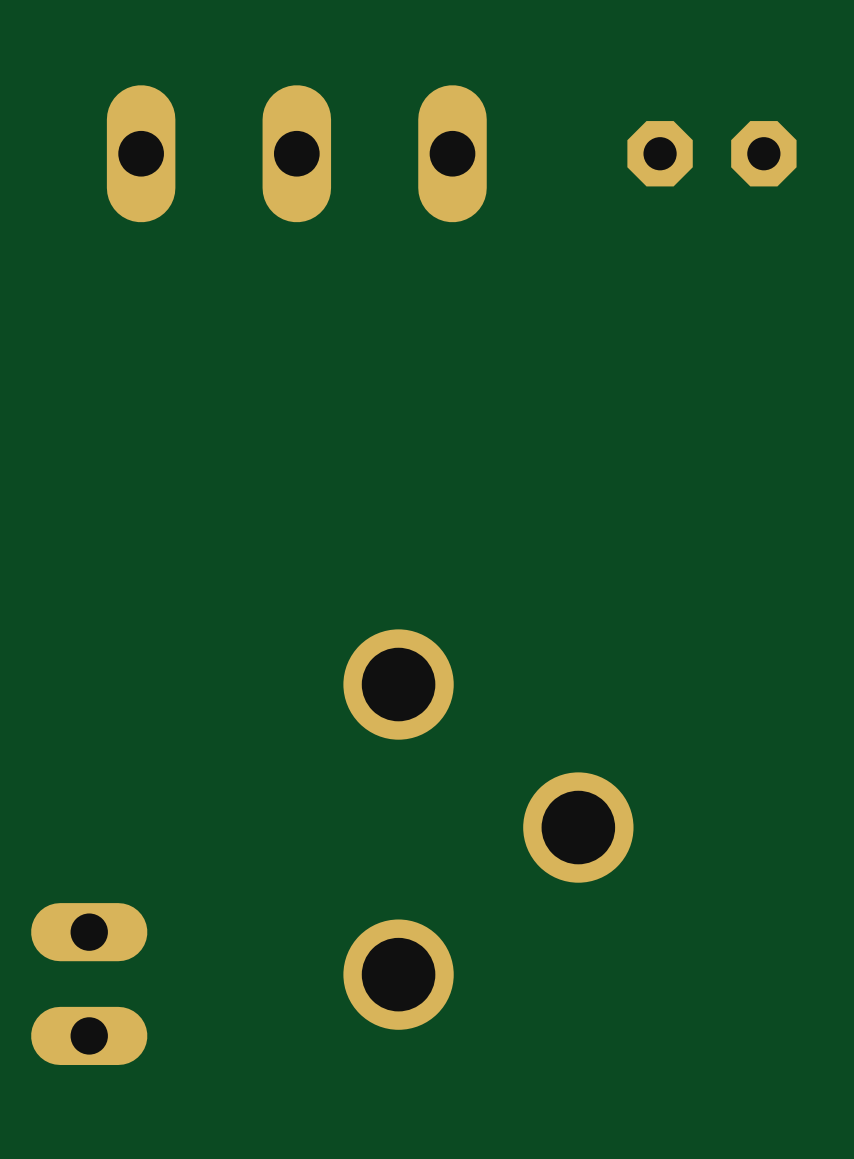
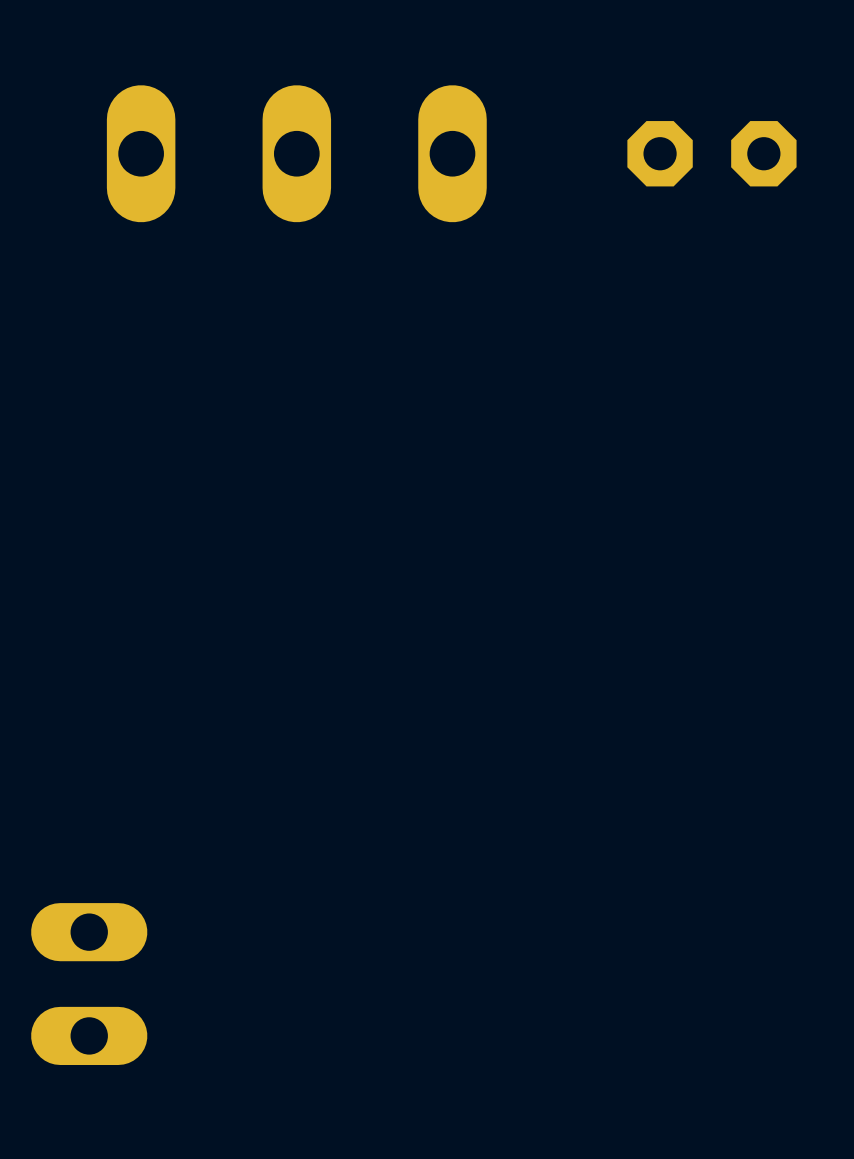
part: (488, 829) -> none

